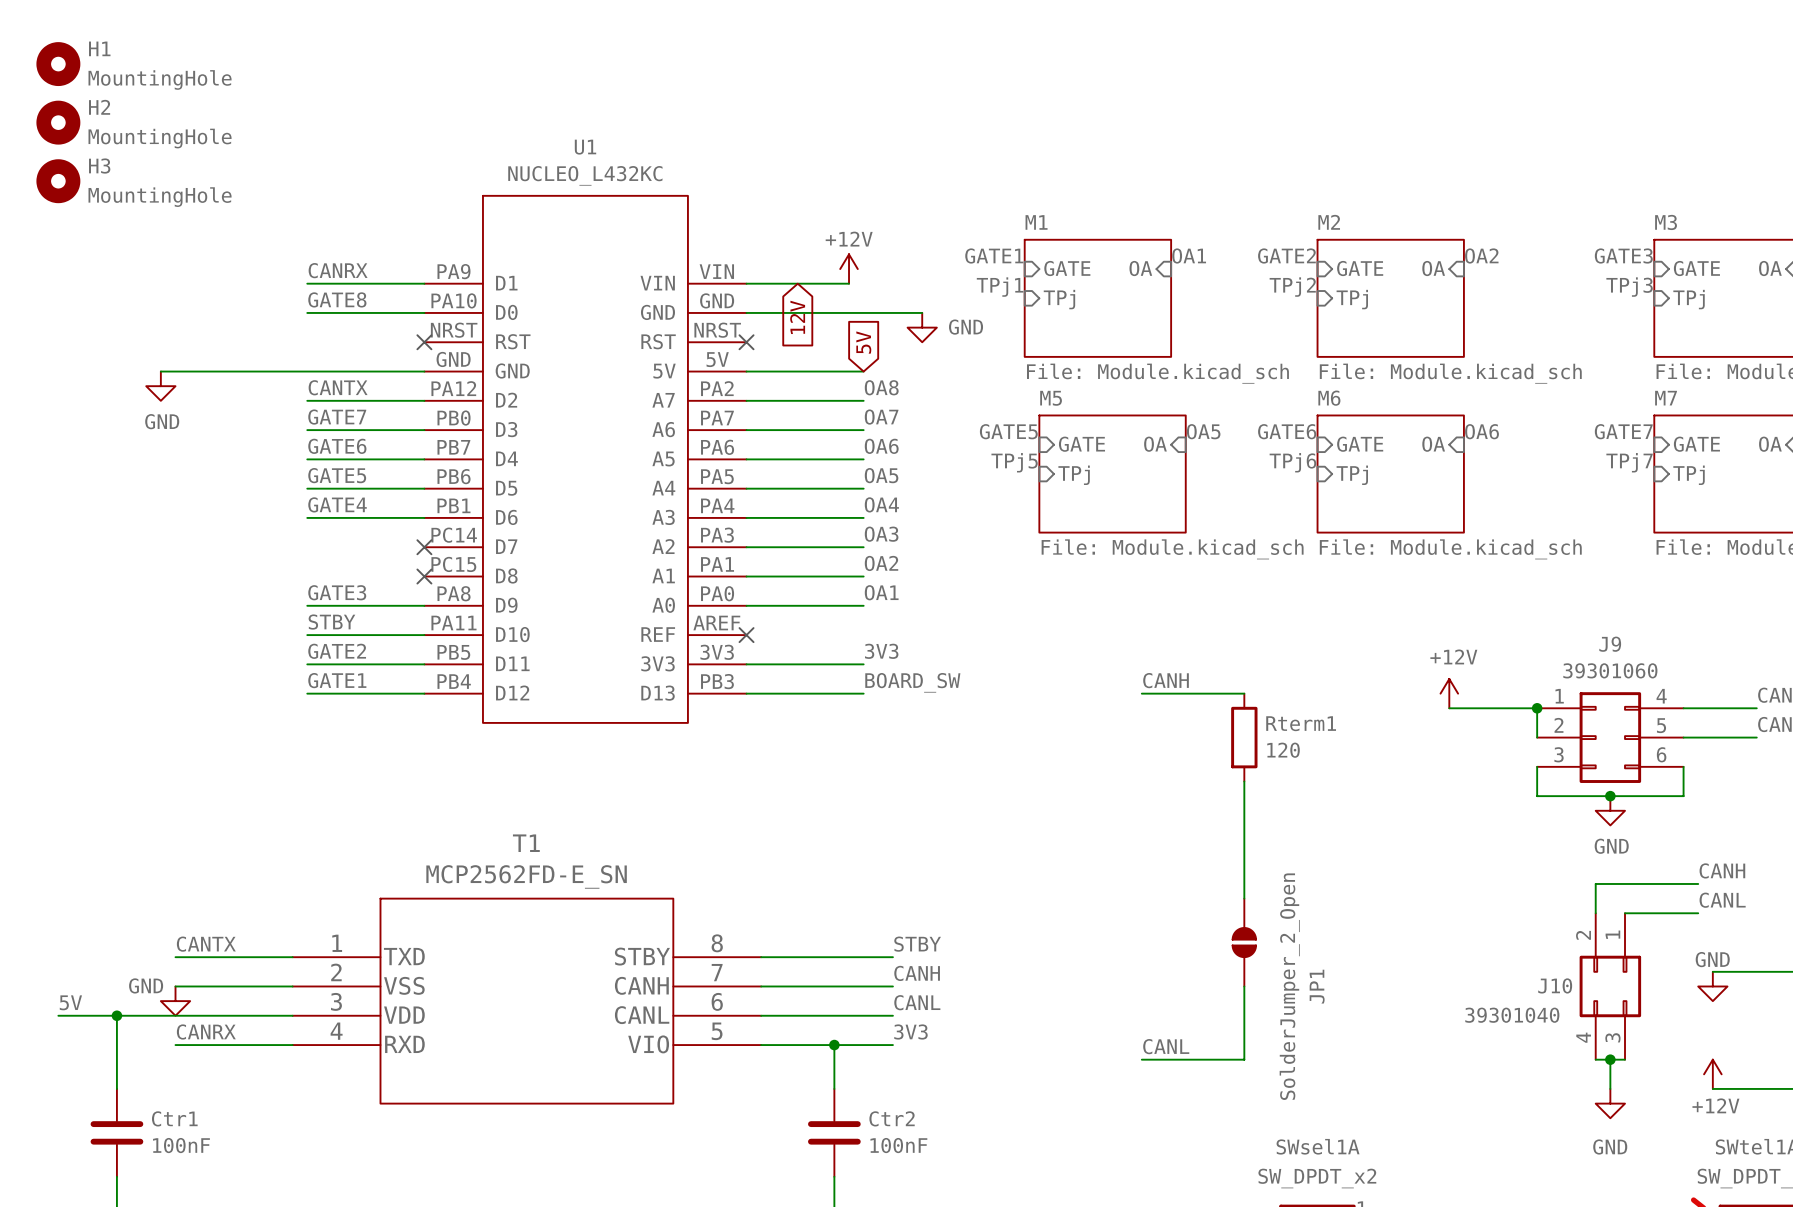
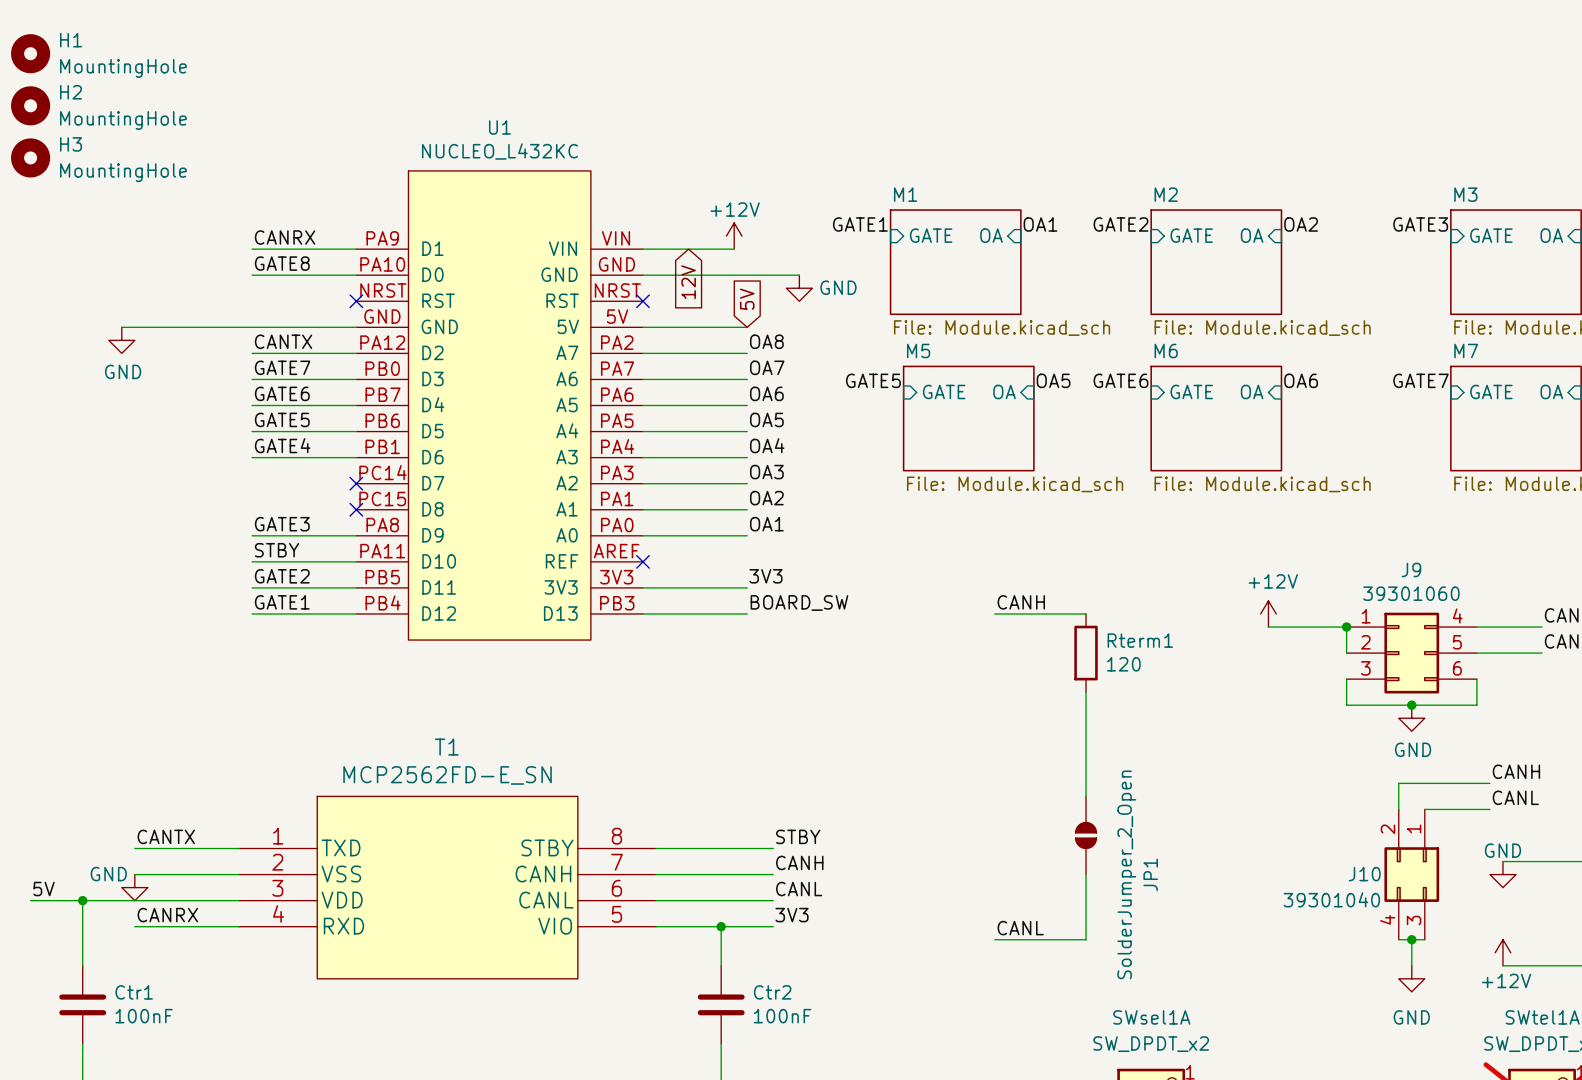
label: TPj1 (1000, 287) -> none
label: TPj2 (1292, 287) -> none
label: TPj3 (1629, 287) -> none
sheet pin: TPj (1059, 299) -> none
sheet pin: TPj (1352, 299) -> none
sheet pin: TPj (1689, 299) -> none
label: TPj5 (1014, 462) -> none
label: TPj6 (1292, 462) -> none
label: TPj7 (1629, 462) -> none
sheet pin: TPj (1074, 475) -> none
sheet pin: TPj (1352, 475) -> none
sheet pin: TPj (1689, 475) -> none

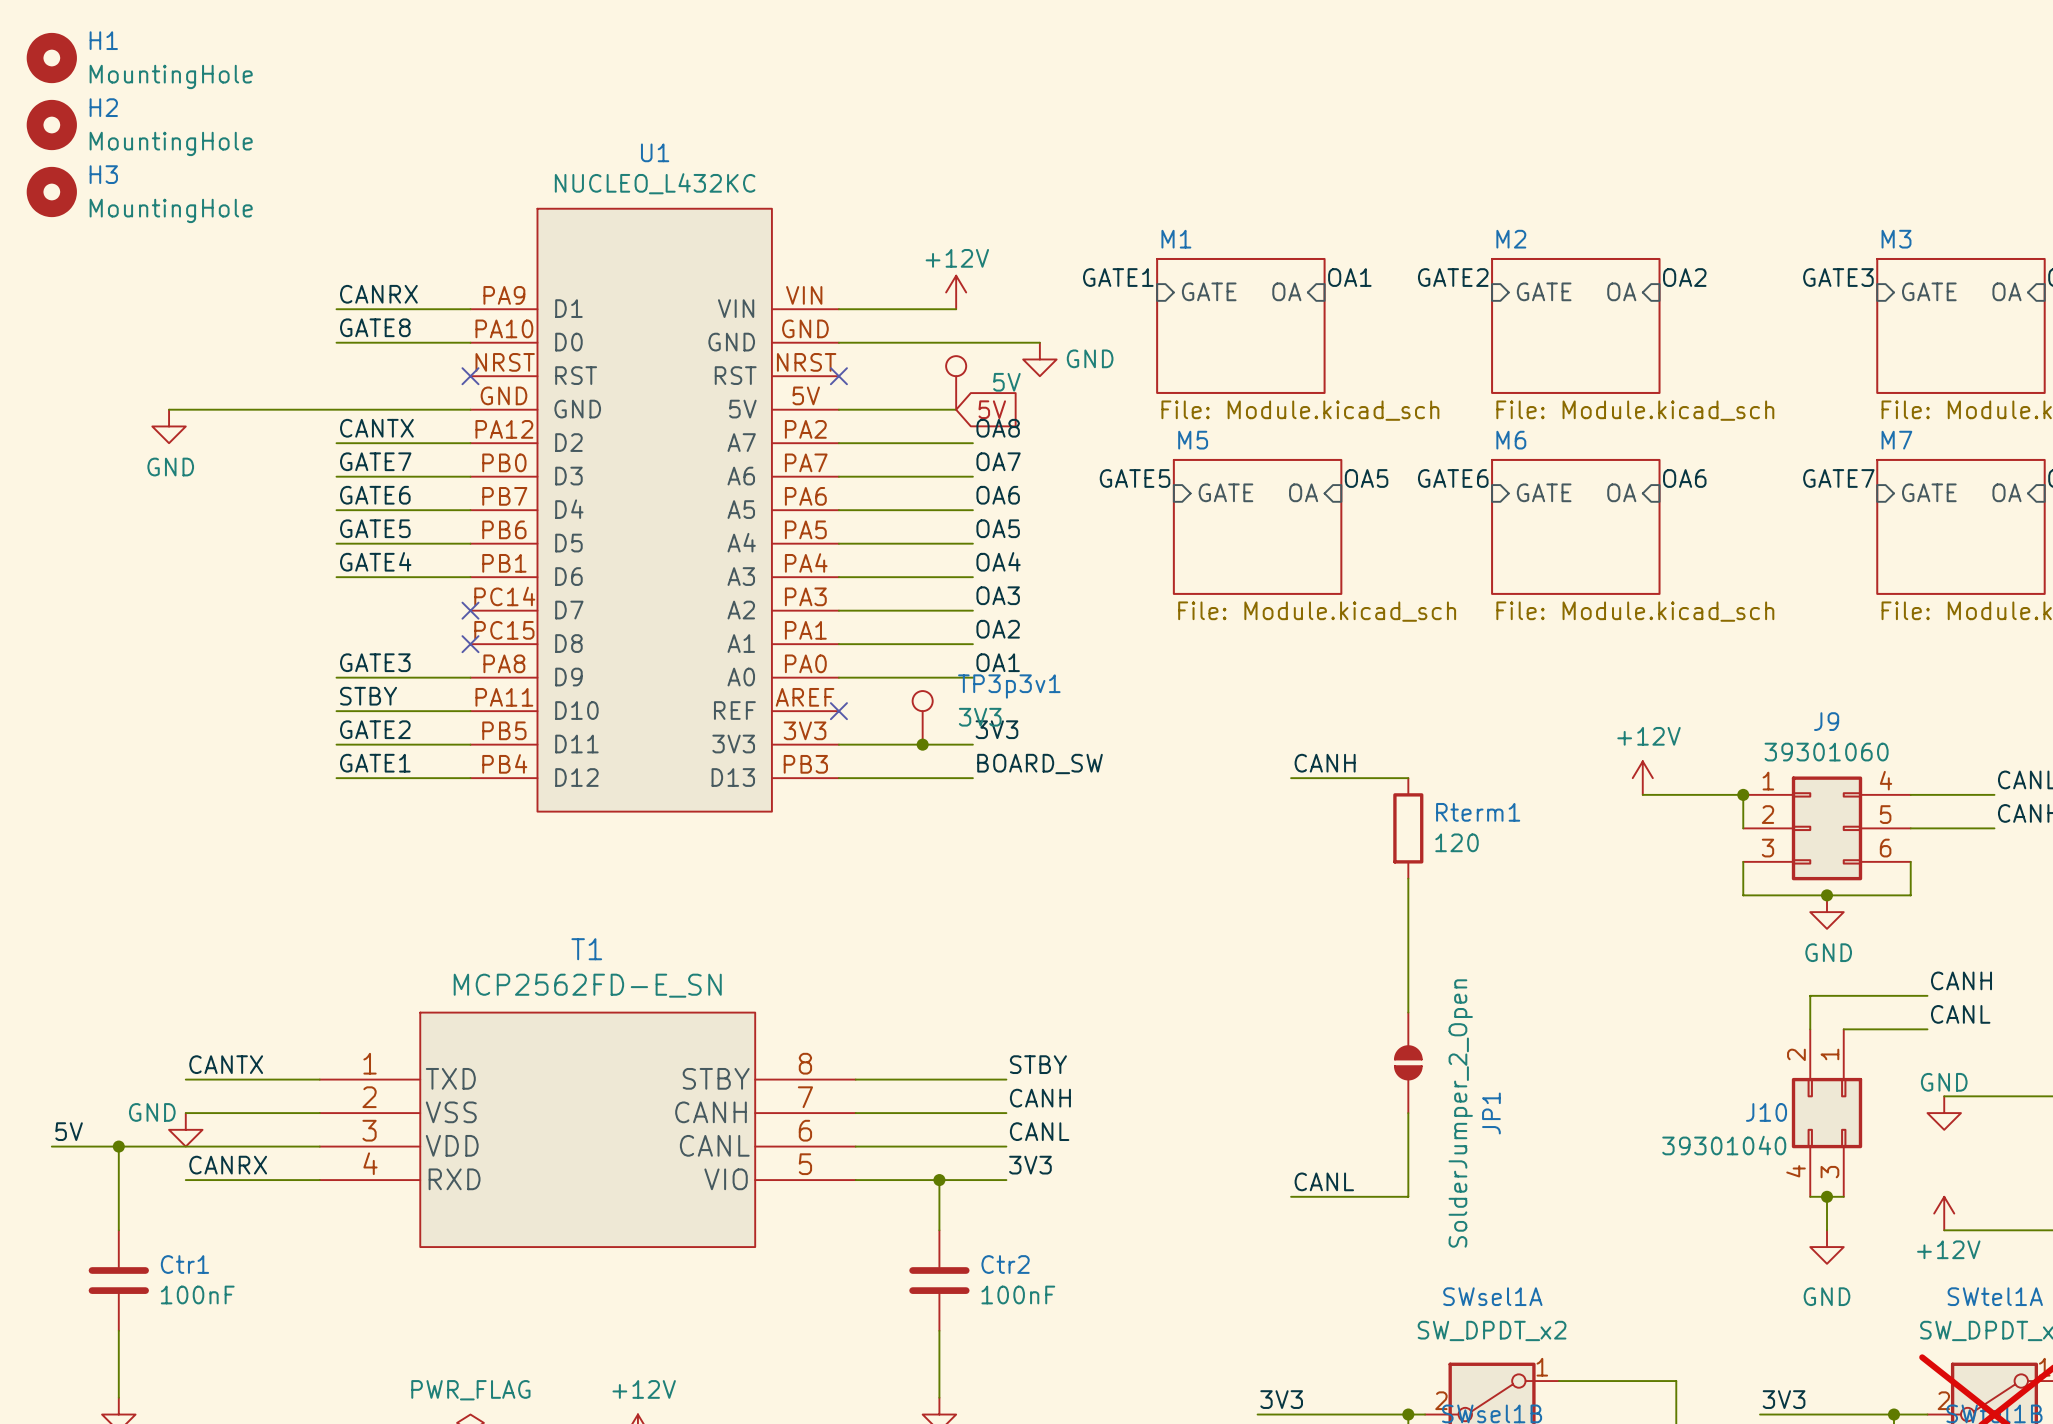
global label: 12V (688, 282) -> none
global label rotation: 0° (747, 299) -> 90° clockwise (992, 409)
part: none -> 5V (956, 382)
wire: (734, 327) (747, 327) -> none
TP3p3v1: none -> 3V3 (922, 717)
junction: none -> (922, 744)

